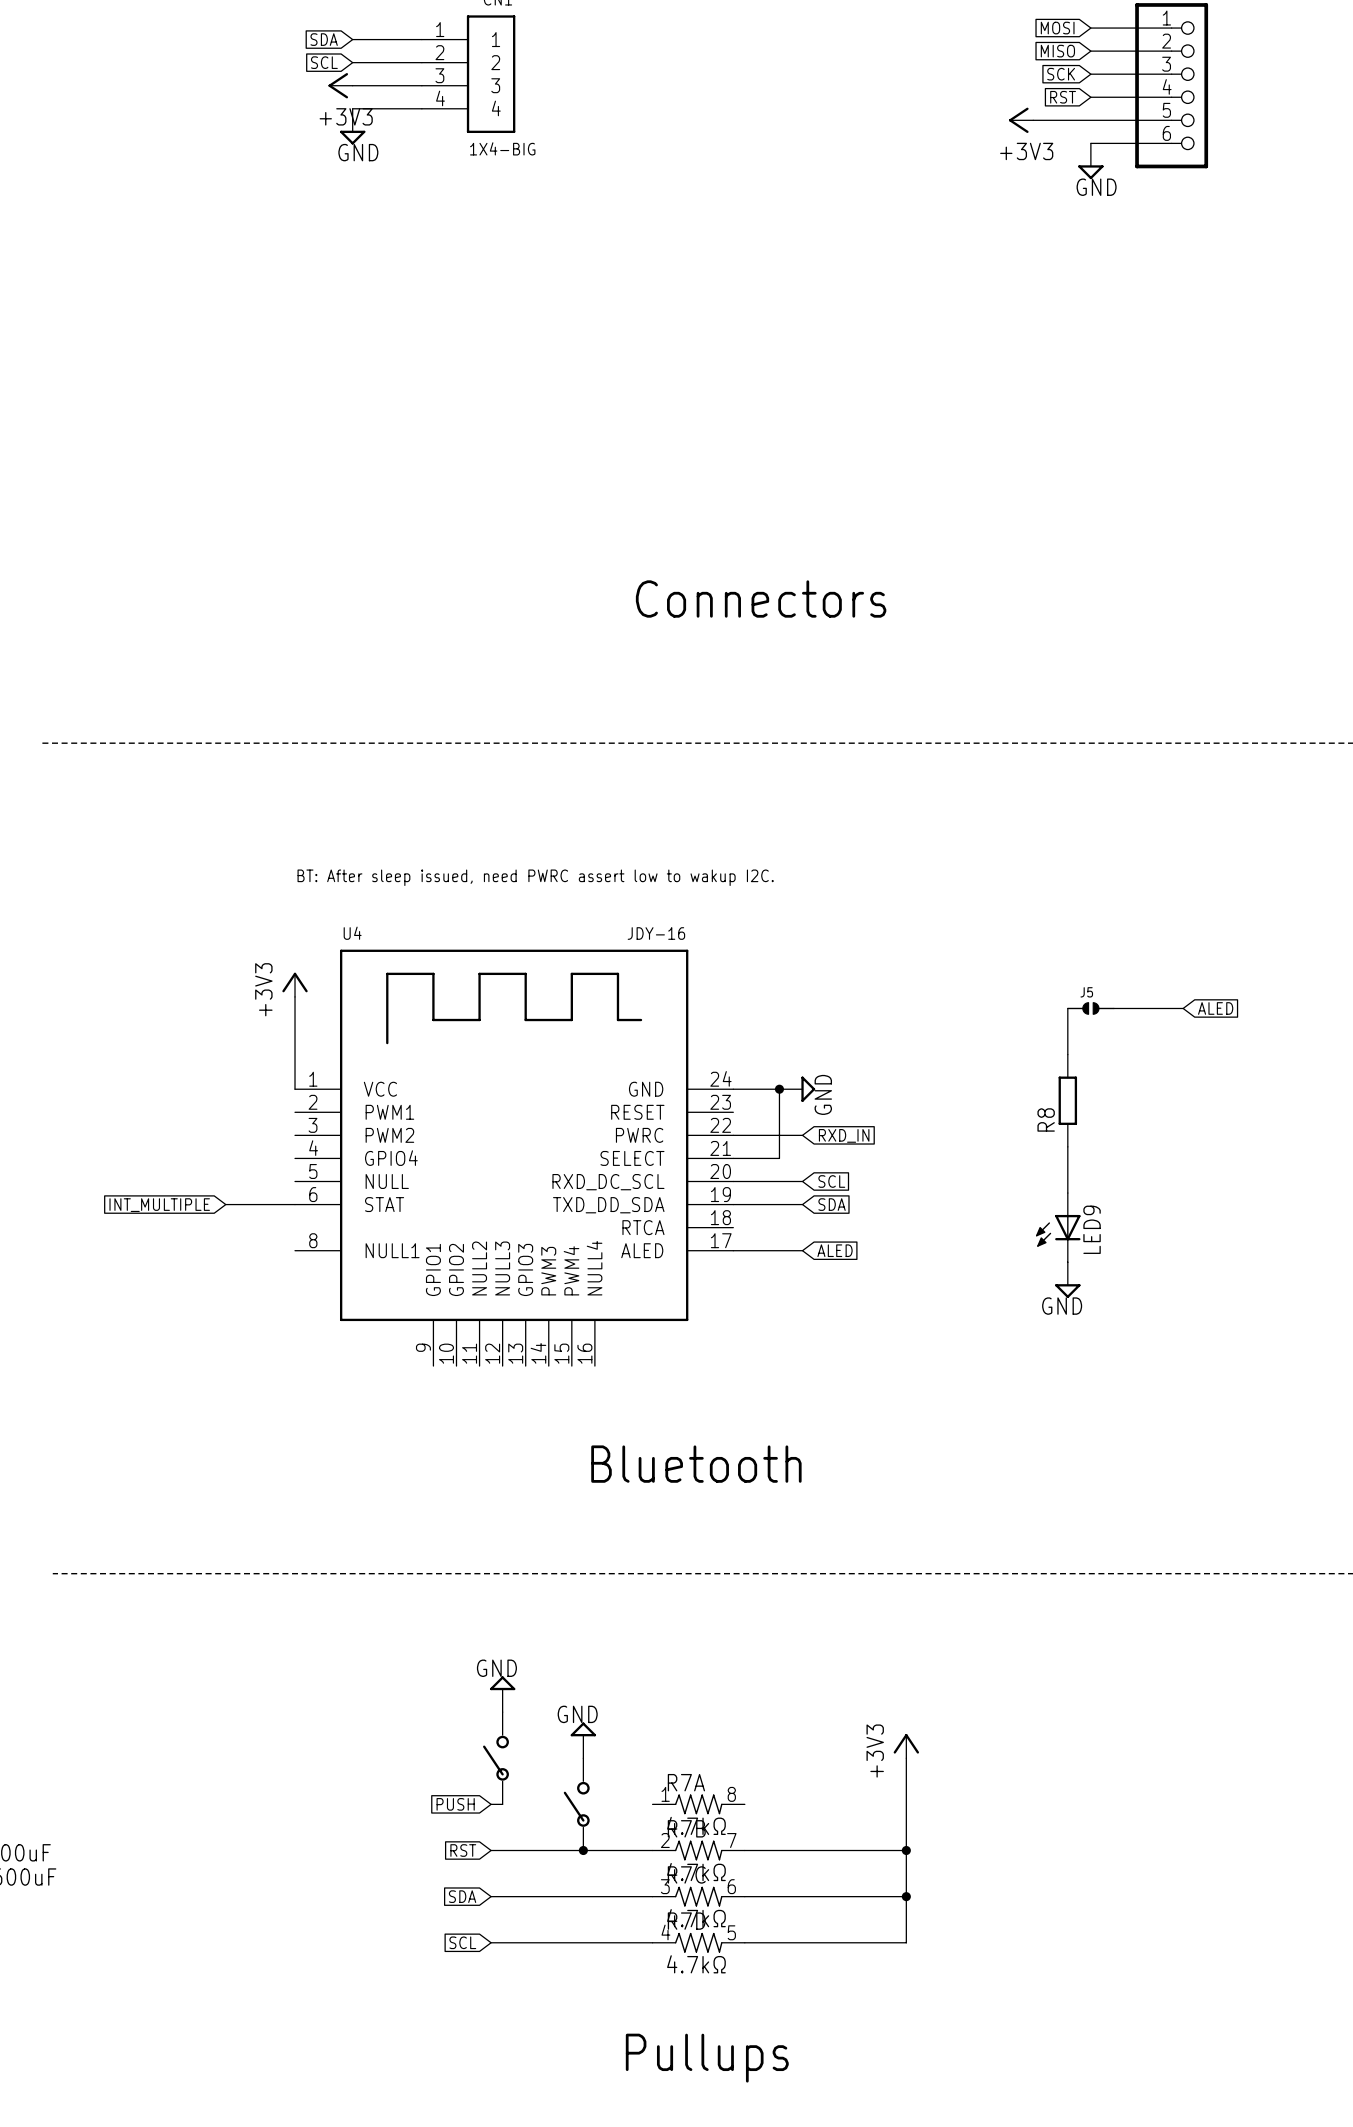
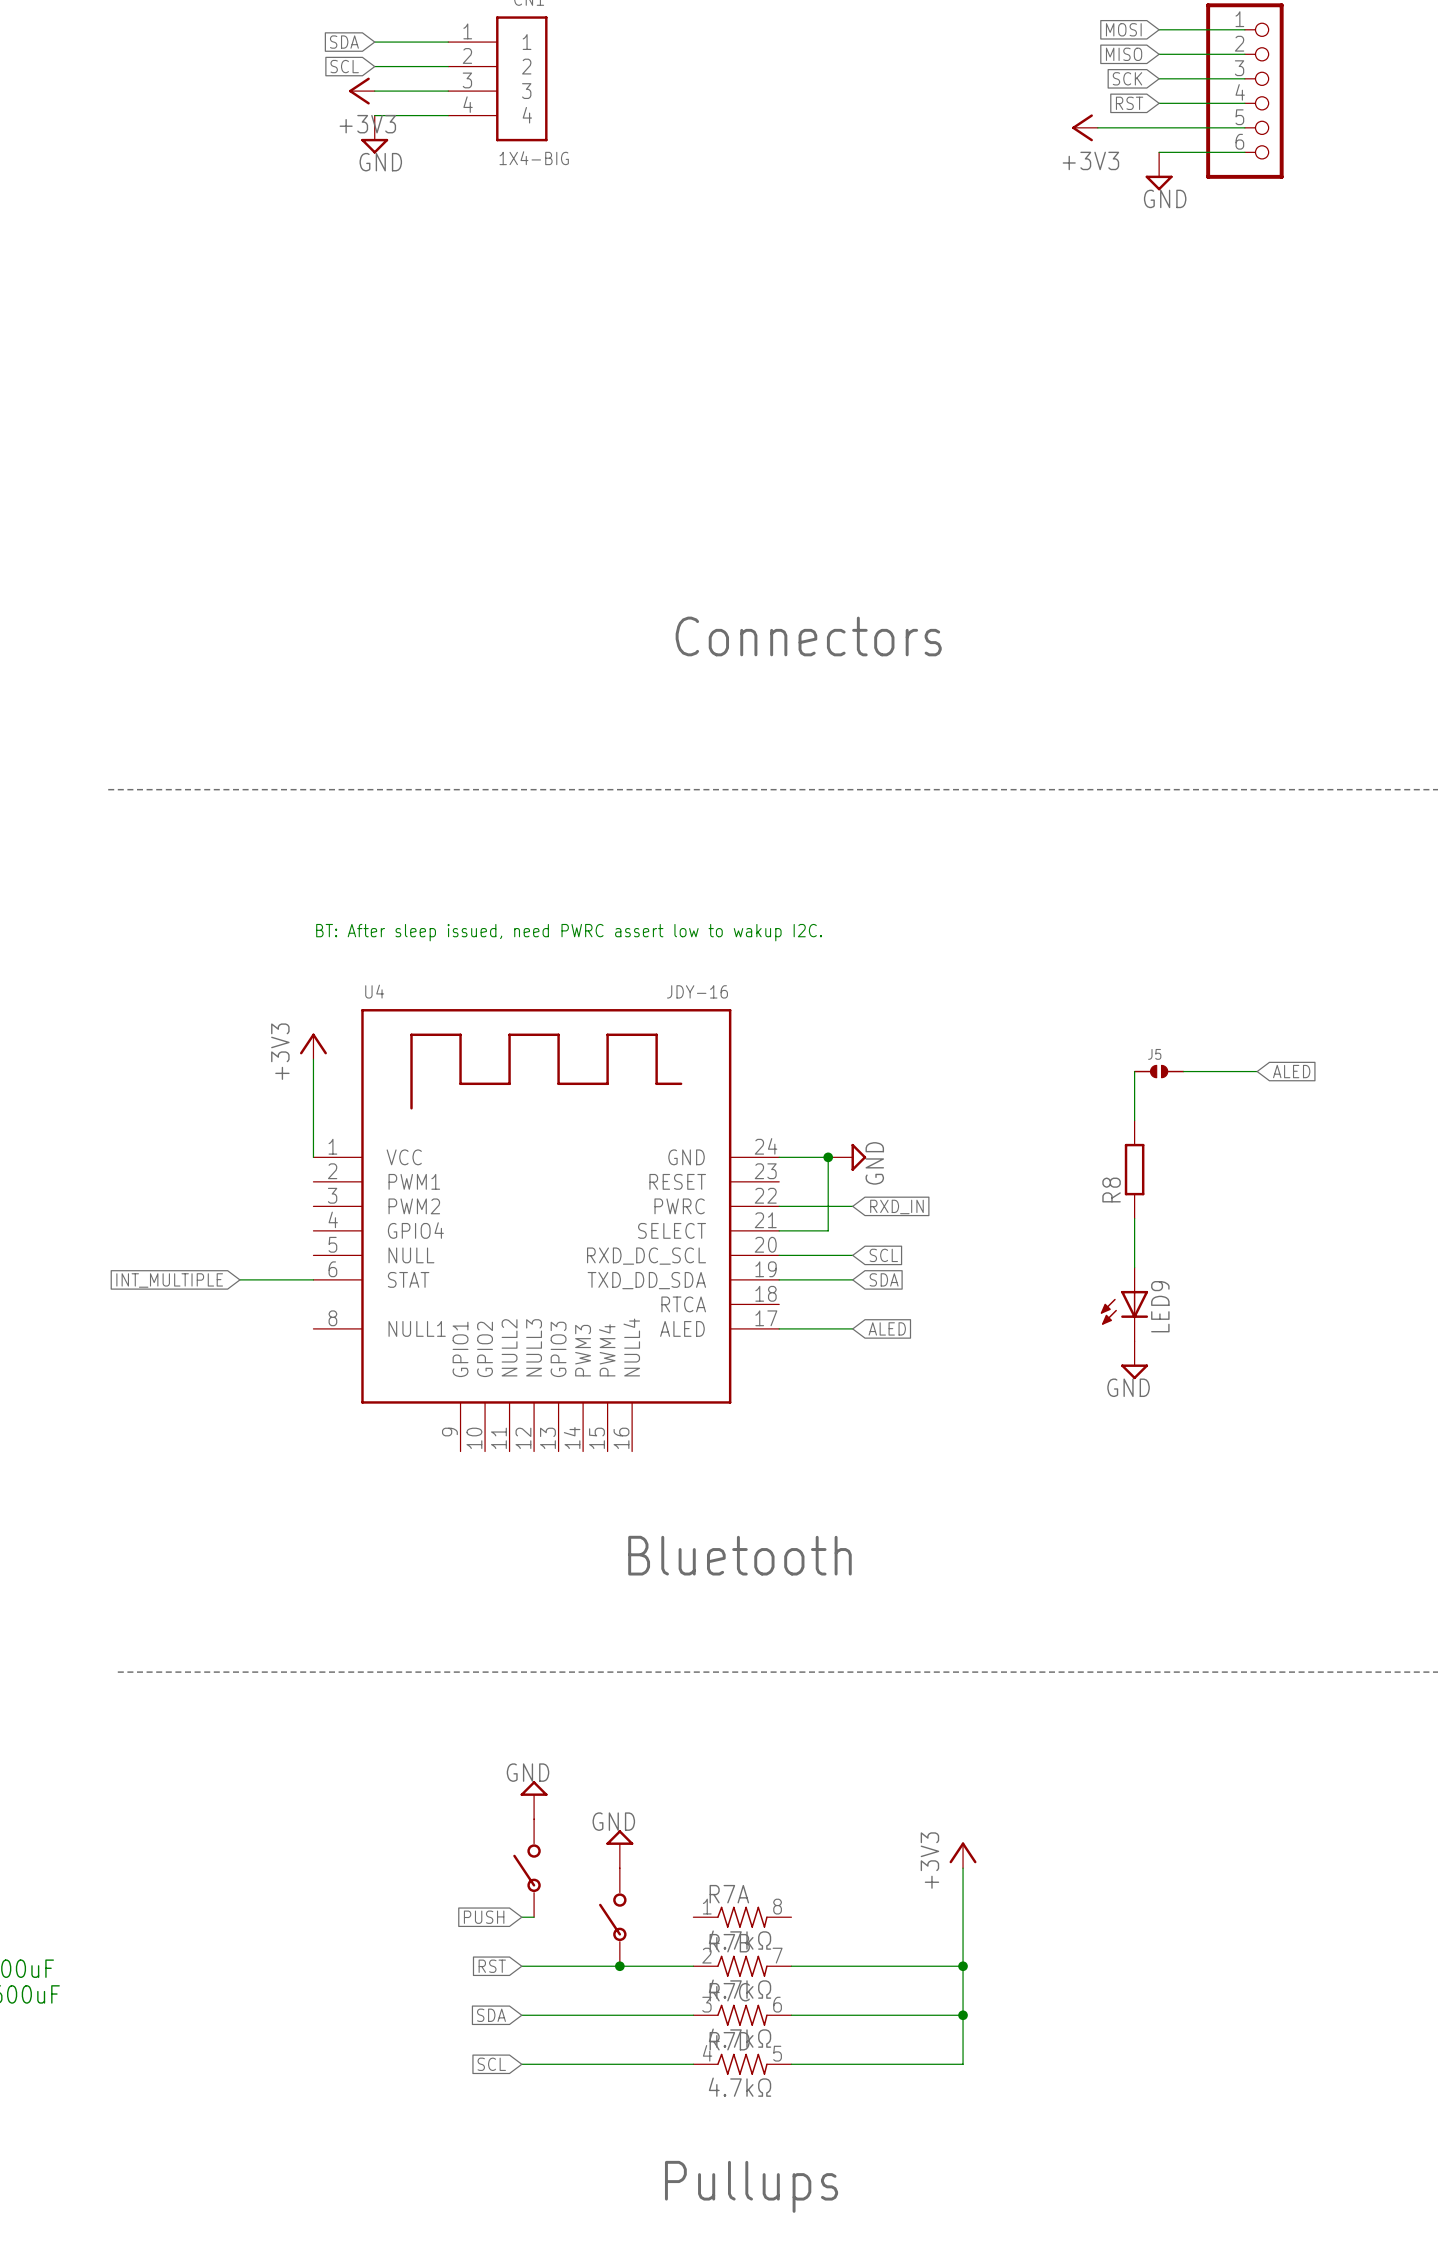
line: (41, 743) (98, 743) -> none
line: (52, 1573) (110, 1573) -> none

